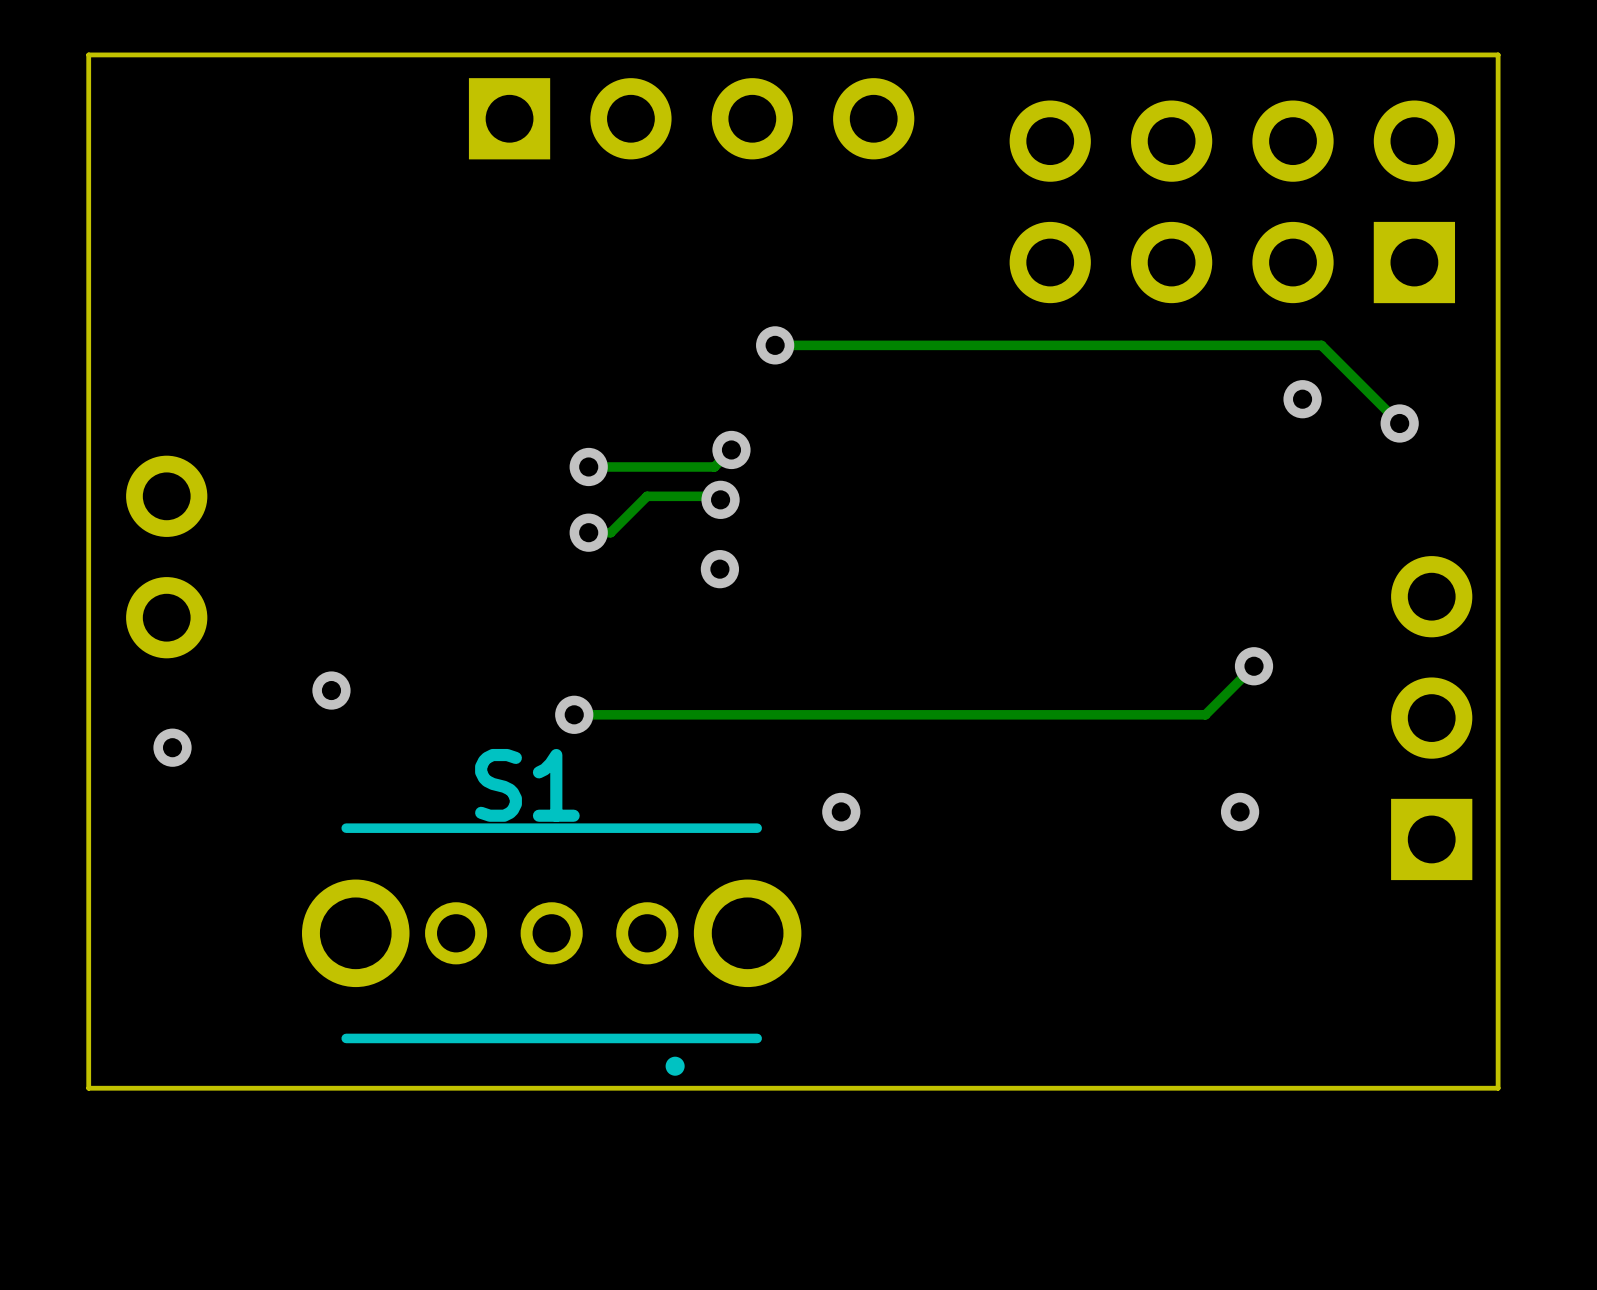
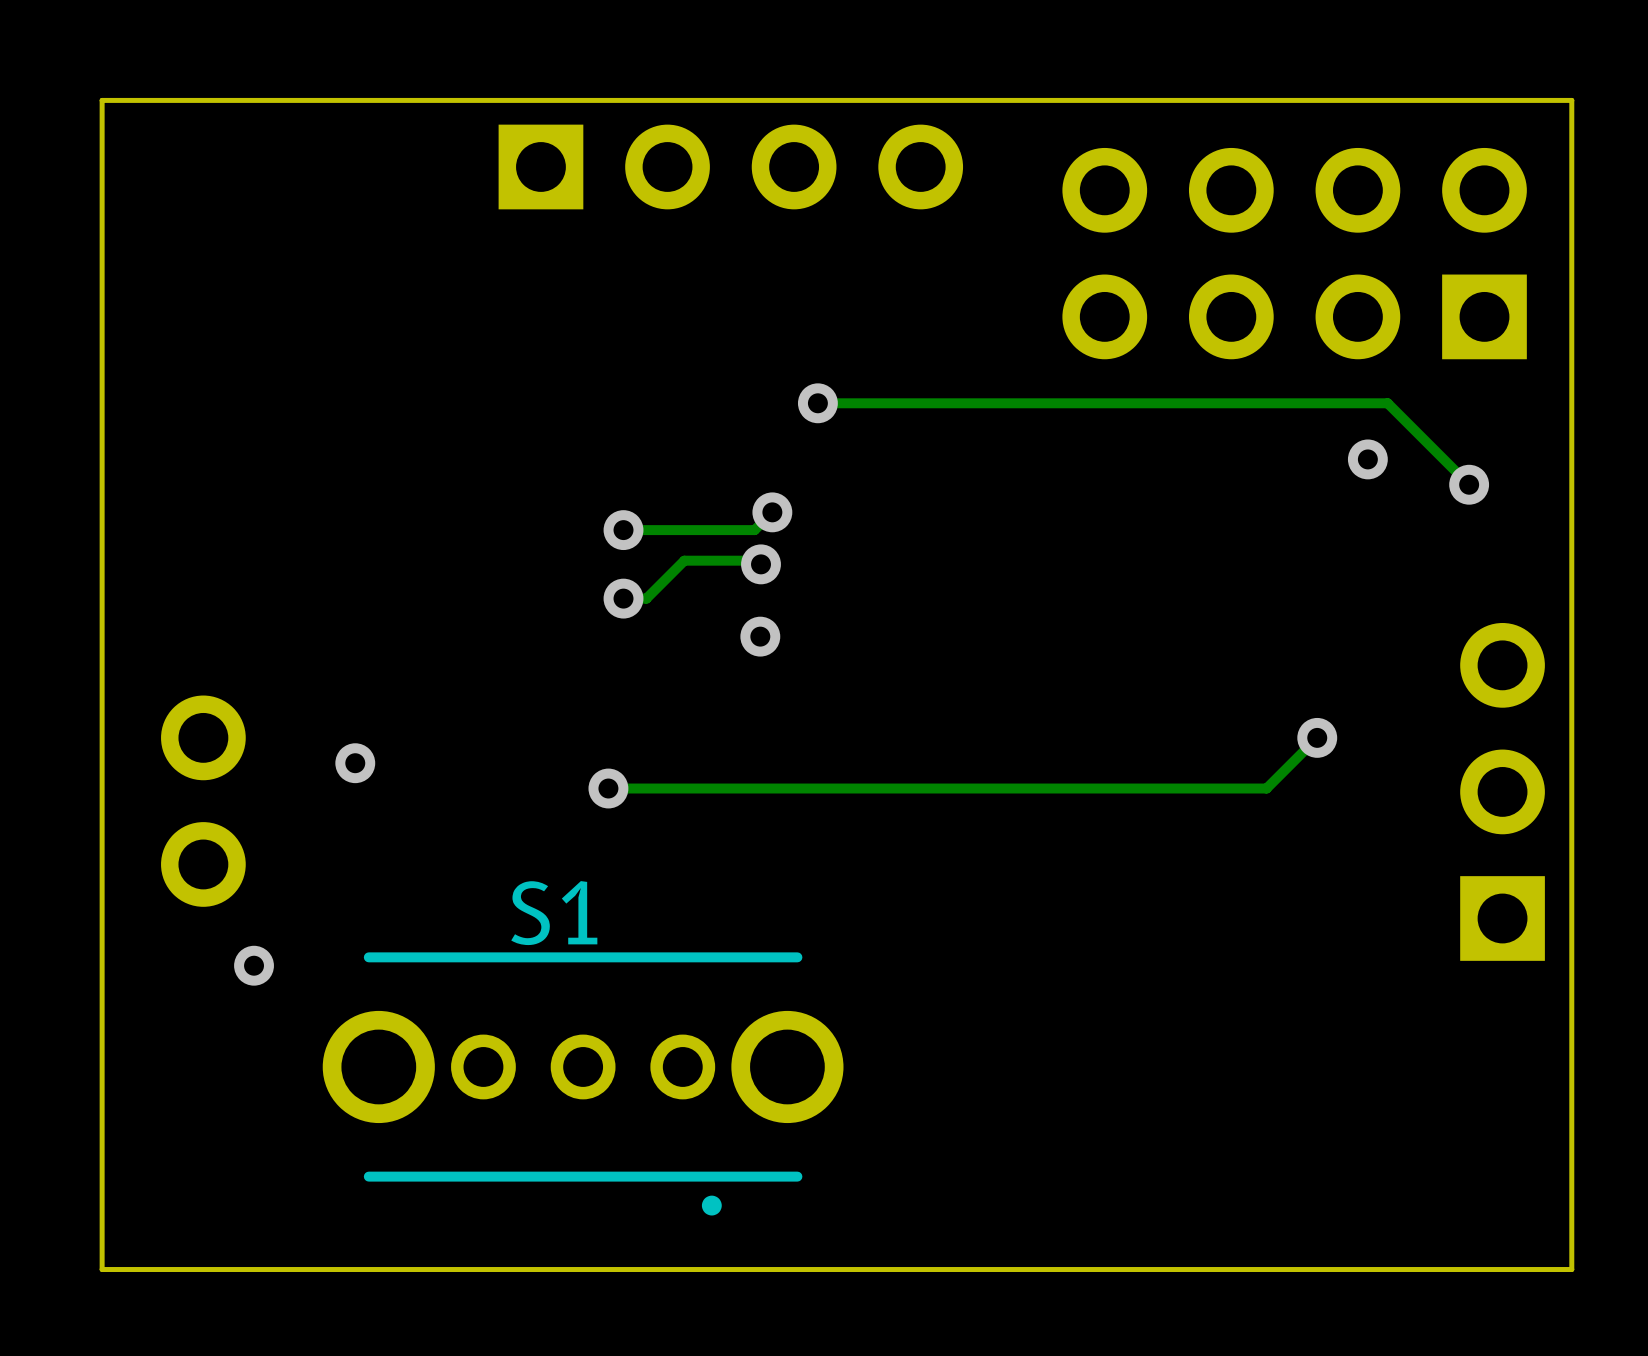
part position: (166, 557) -> (203, 801)
via position: (172, 747) -> (254, 965)
via: (841, 811) -> none
via: (1240, 811) -> none
S1 position: (551, 949) -> (583, 1083)
board edge: (1498, 1088) (88, 1088) -> (1571, 1177) (1571, 1269) (102, 1269) (102, 1177)

